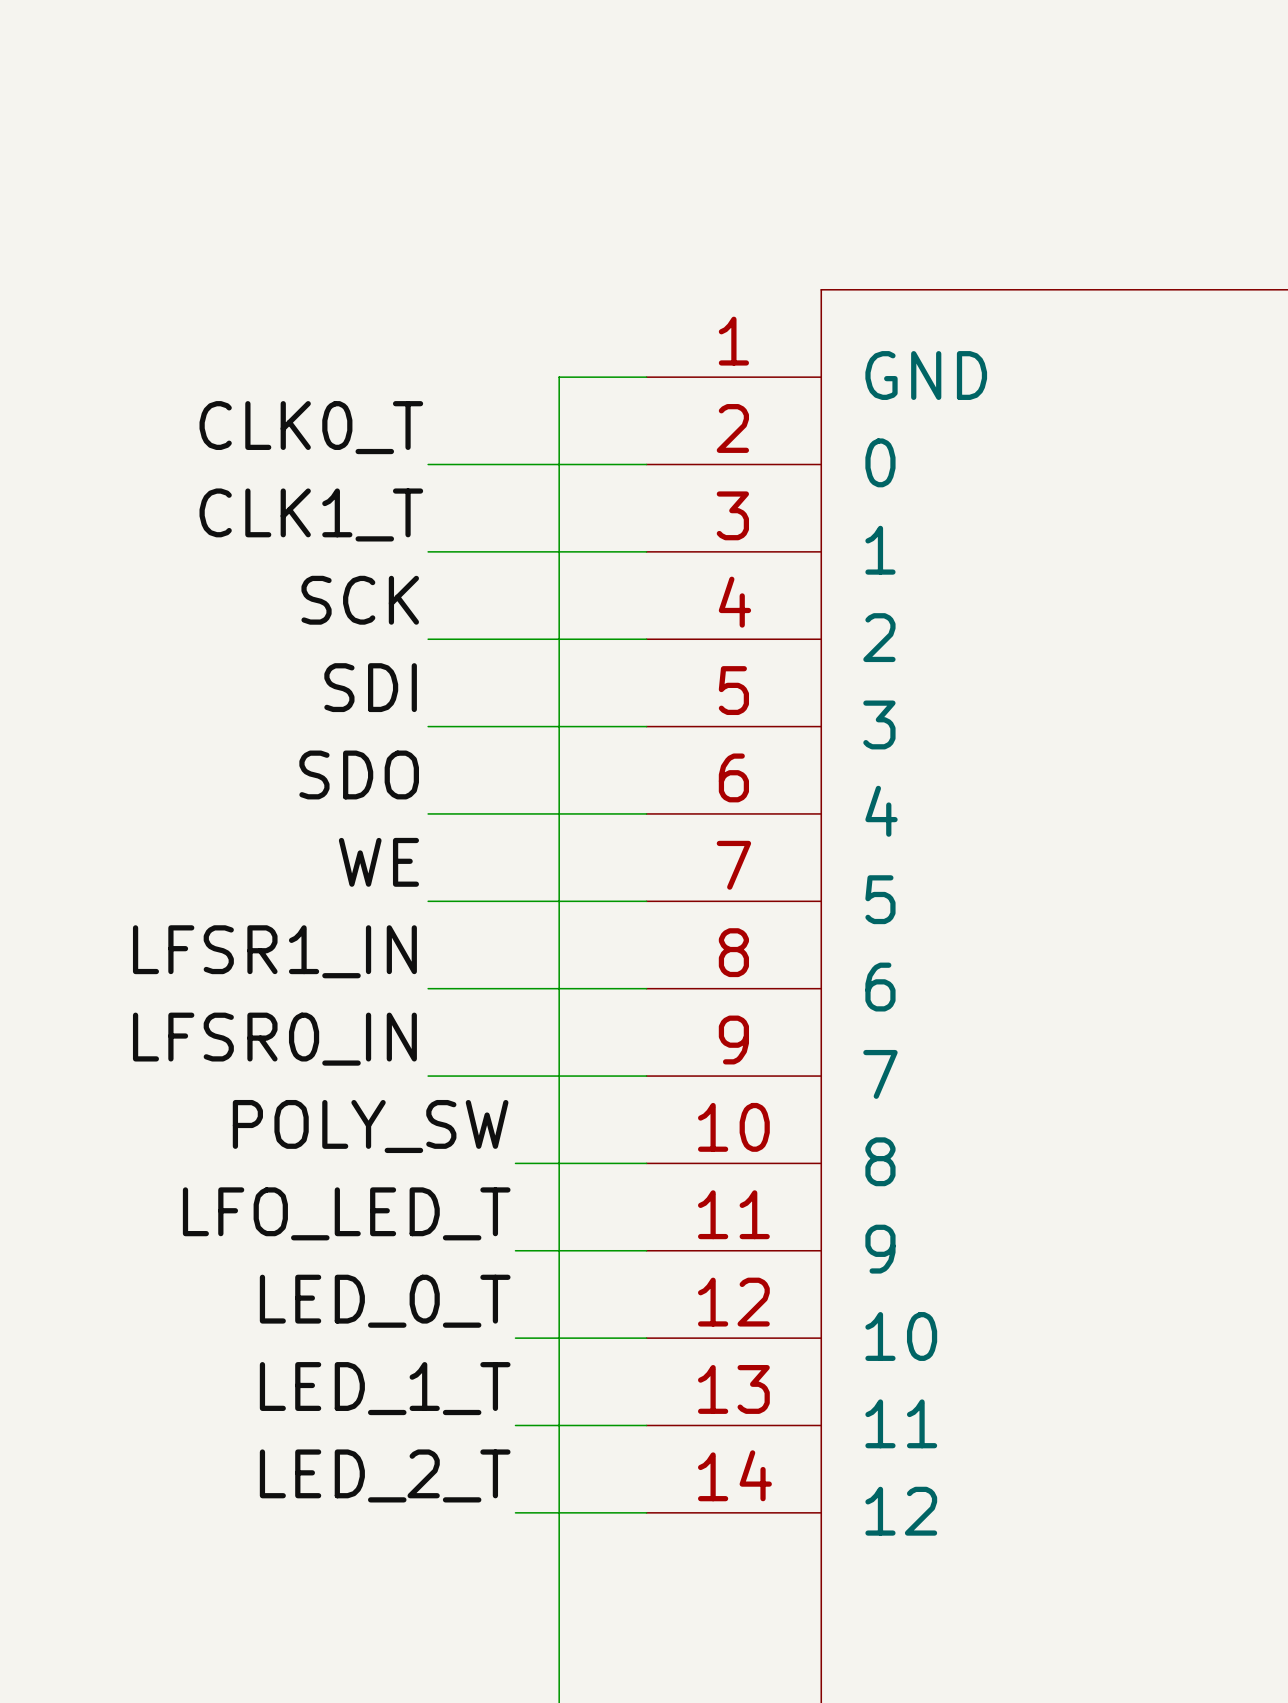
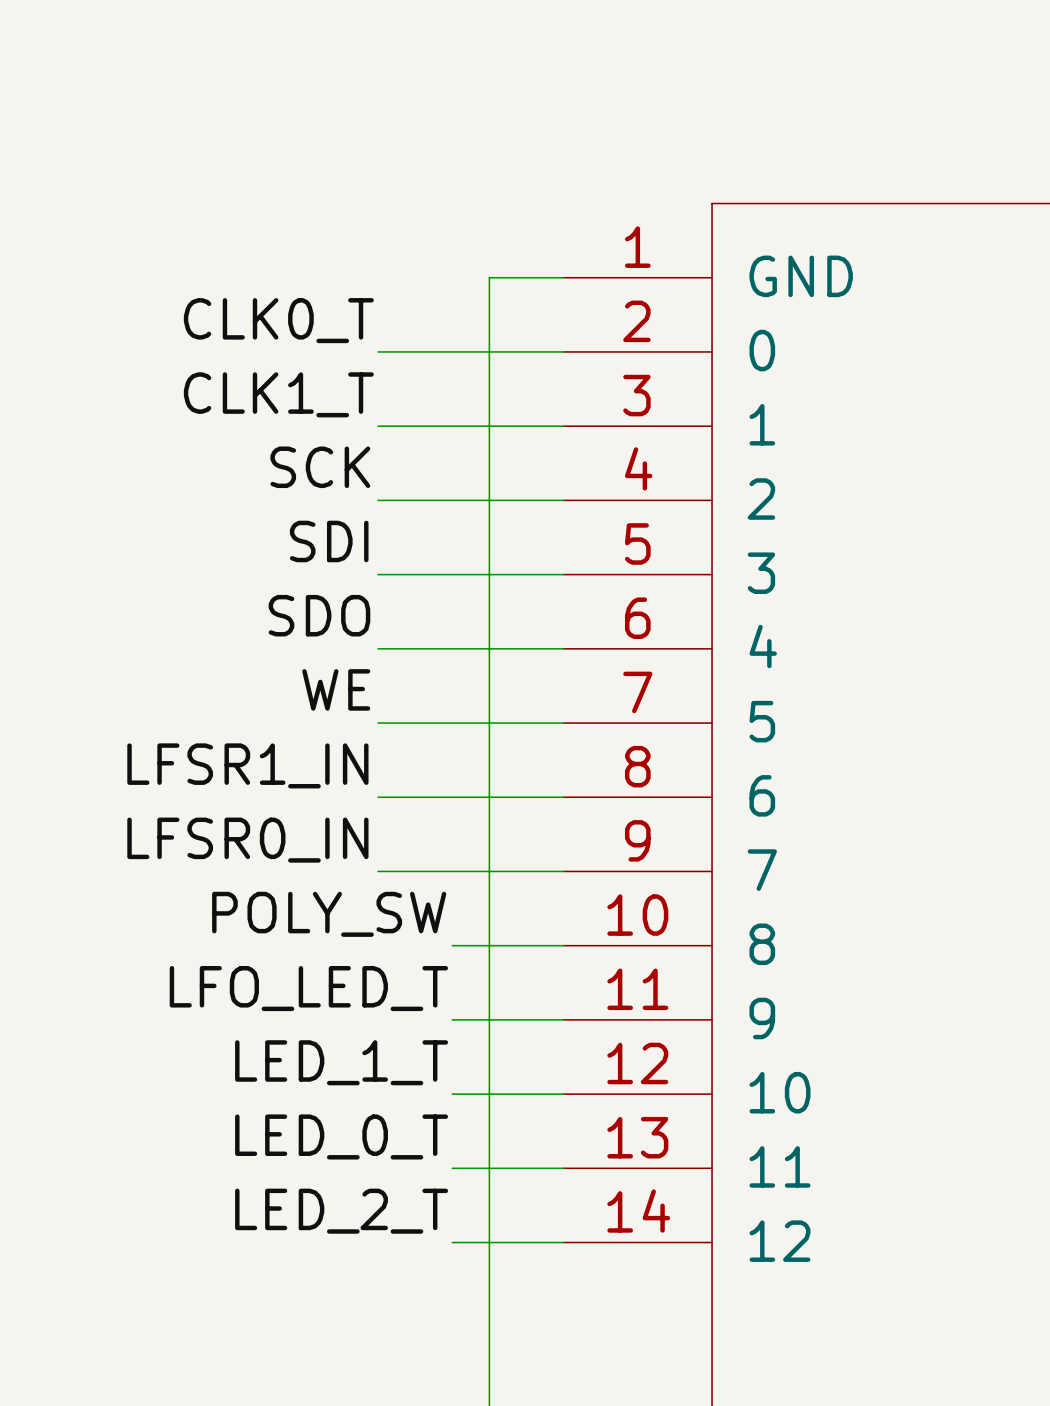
label: LED_0_T (385, 1301) -> LED_1_T (341, 1062)
label: LED_1_T (385, 1388) -> LED_0_T (341, 1136)

